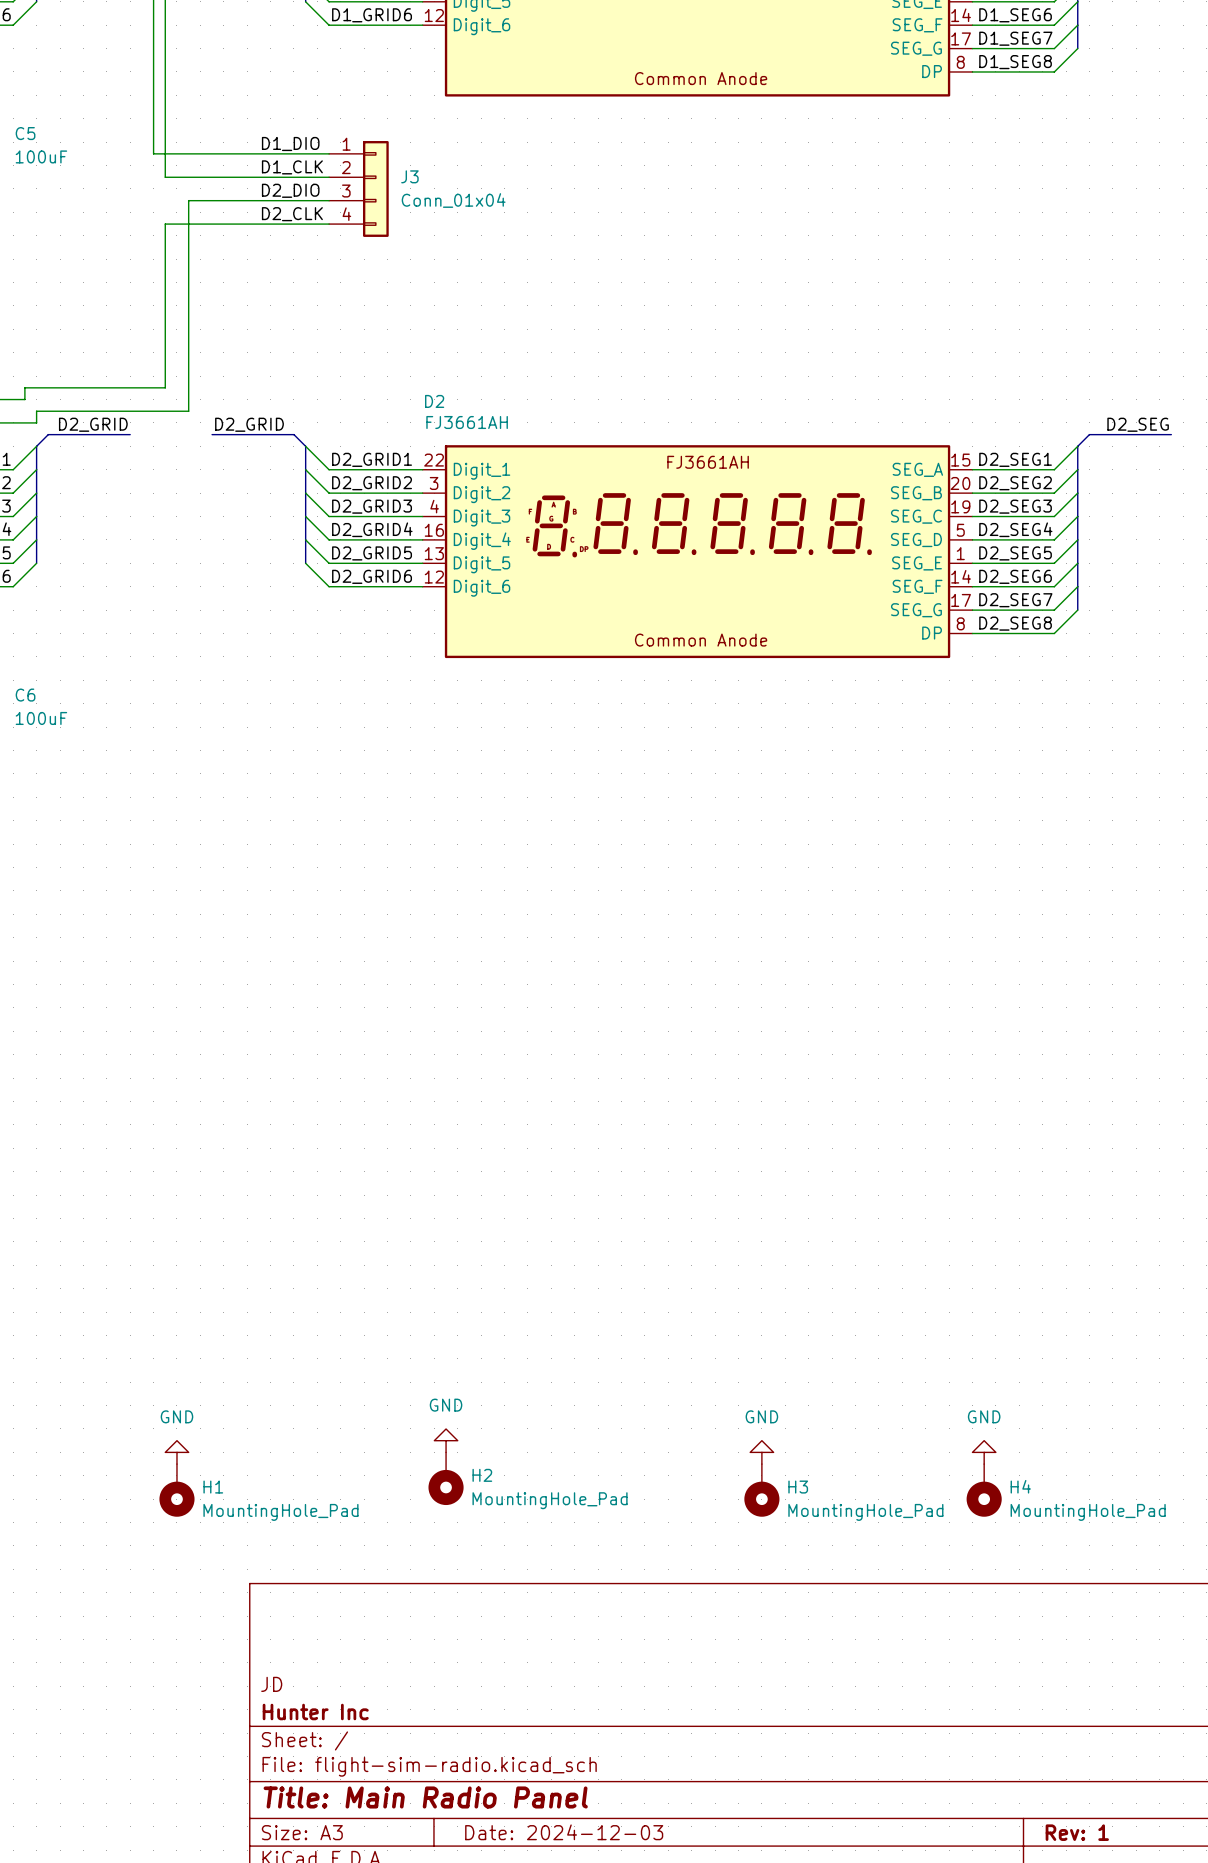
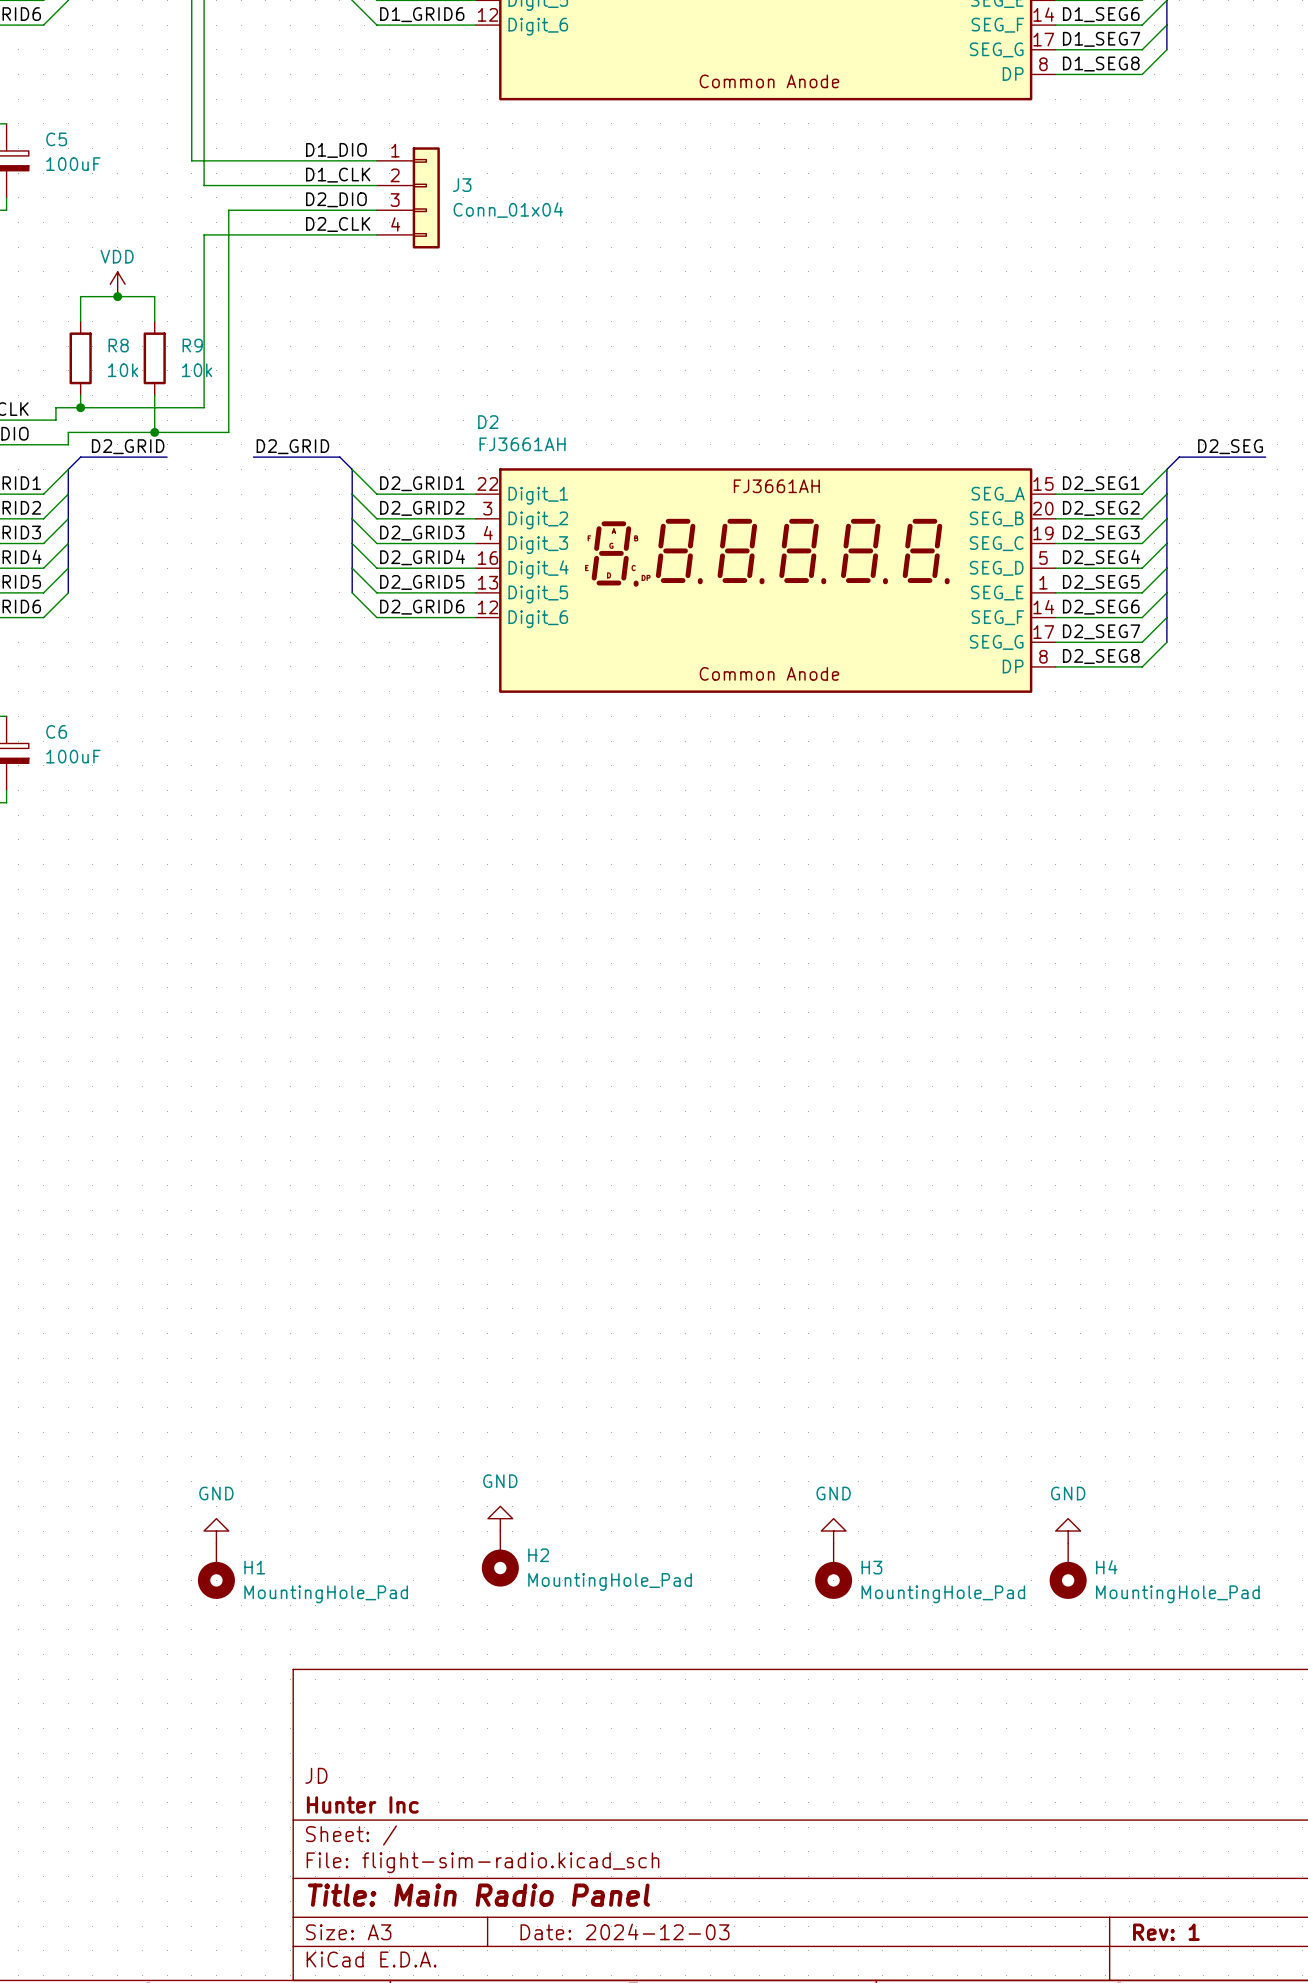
power symbol: none -> VDD (117, 284)
junction: none -> (117, 296)
wire: none -> (80, 321) (80, 296) (154, 296) (154, 321)
R8: none -> 10k (80, 358)
R9: none -> 10k (154, 358)
wire: none -> (80, 395) (80, 407)
wire: none -> (154, 395) (154, 432)
junction: none -> (80, 407)
junction: none -> (154, 432)

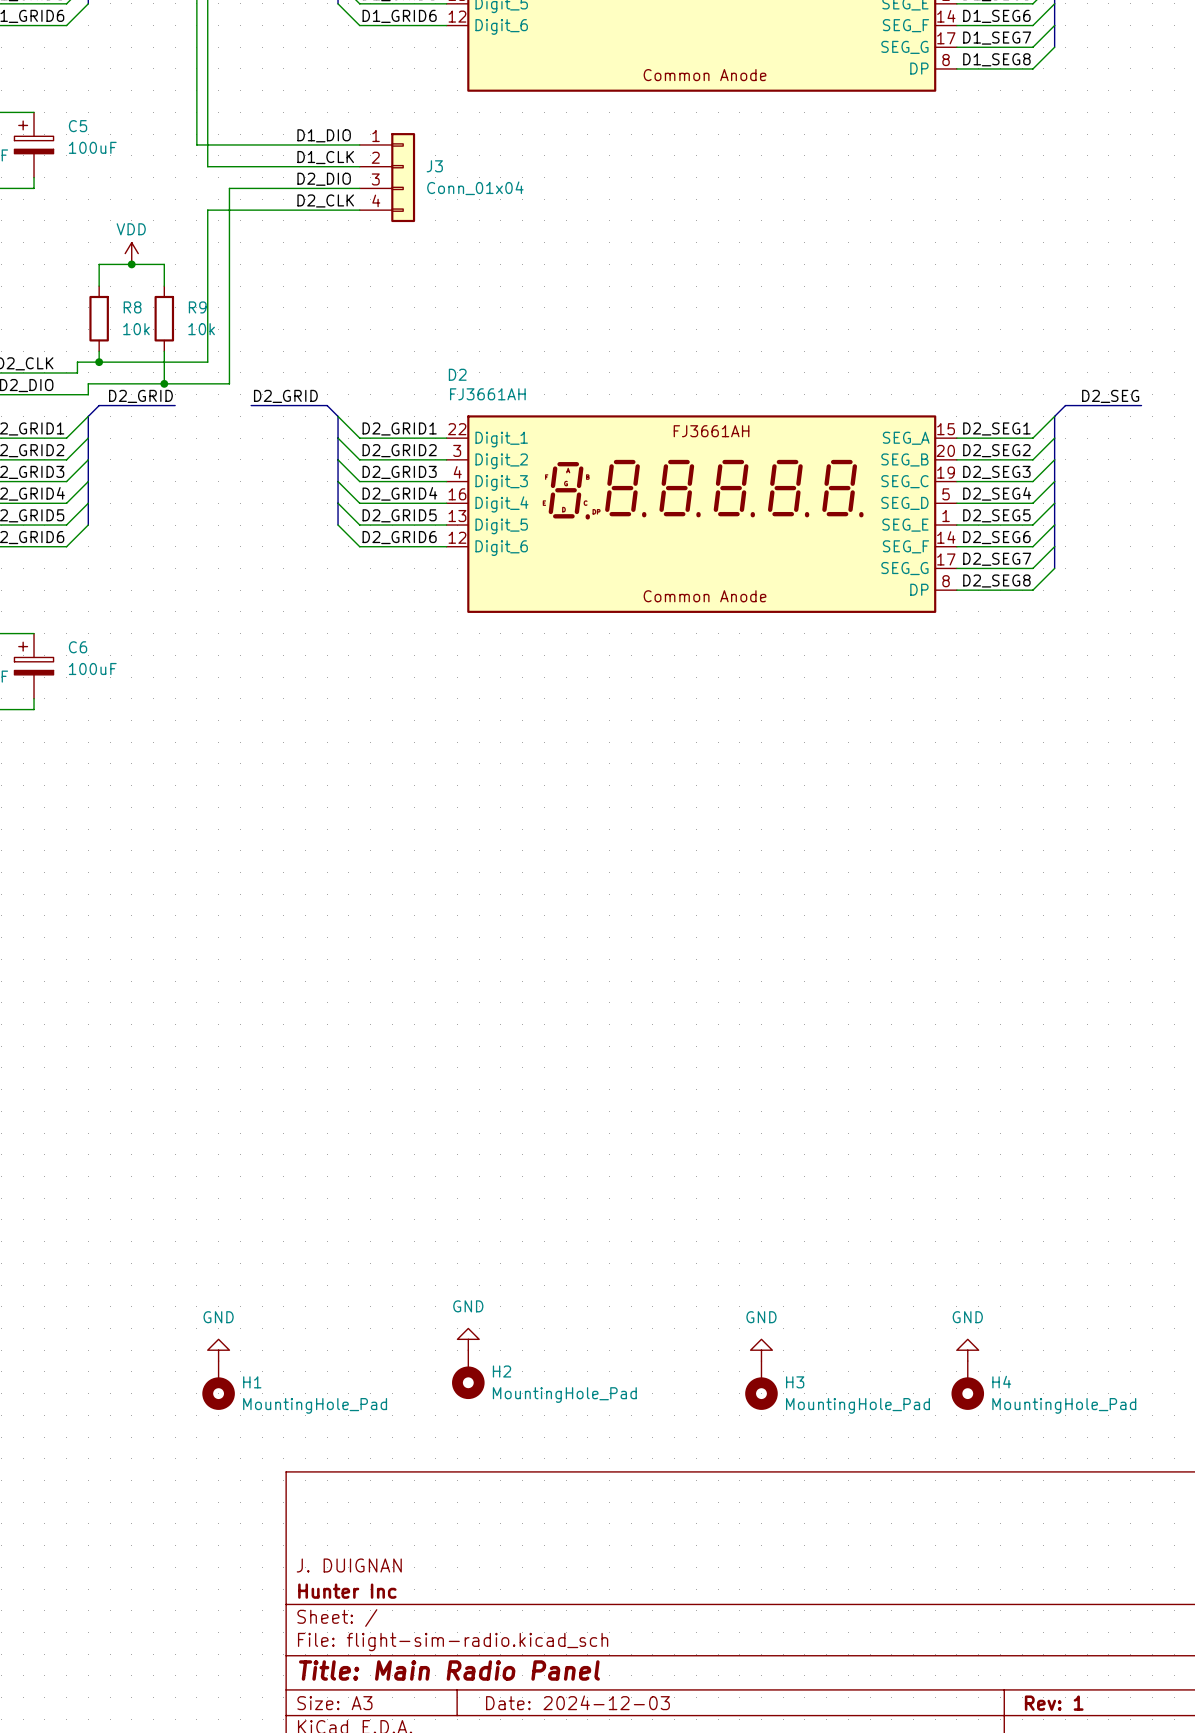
title block: JD (316, 1775) -> J. DUIGNAN (349, 1565)

